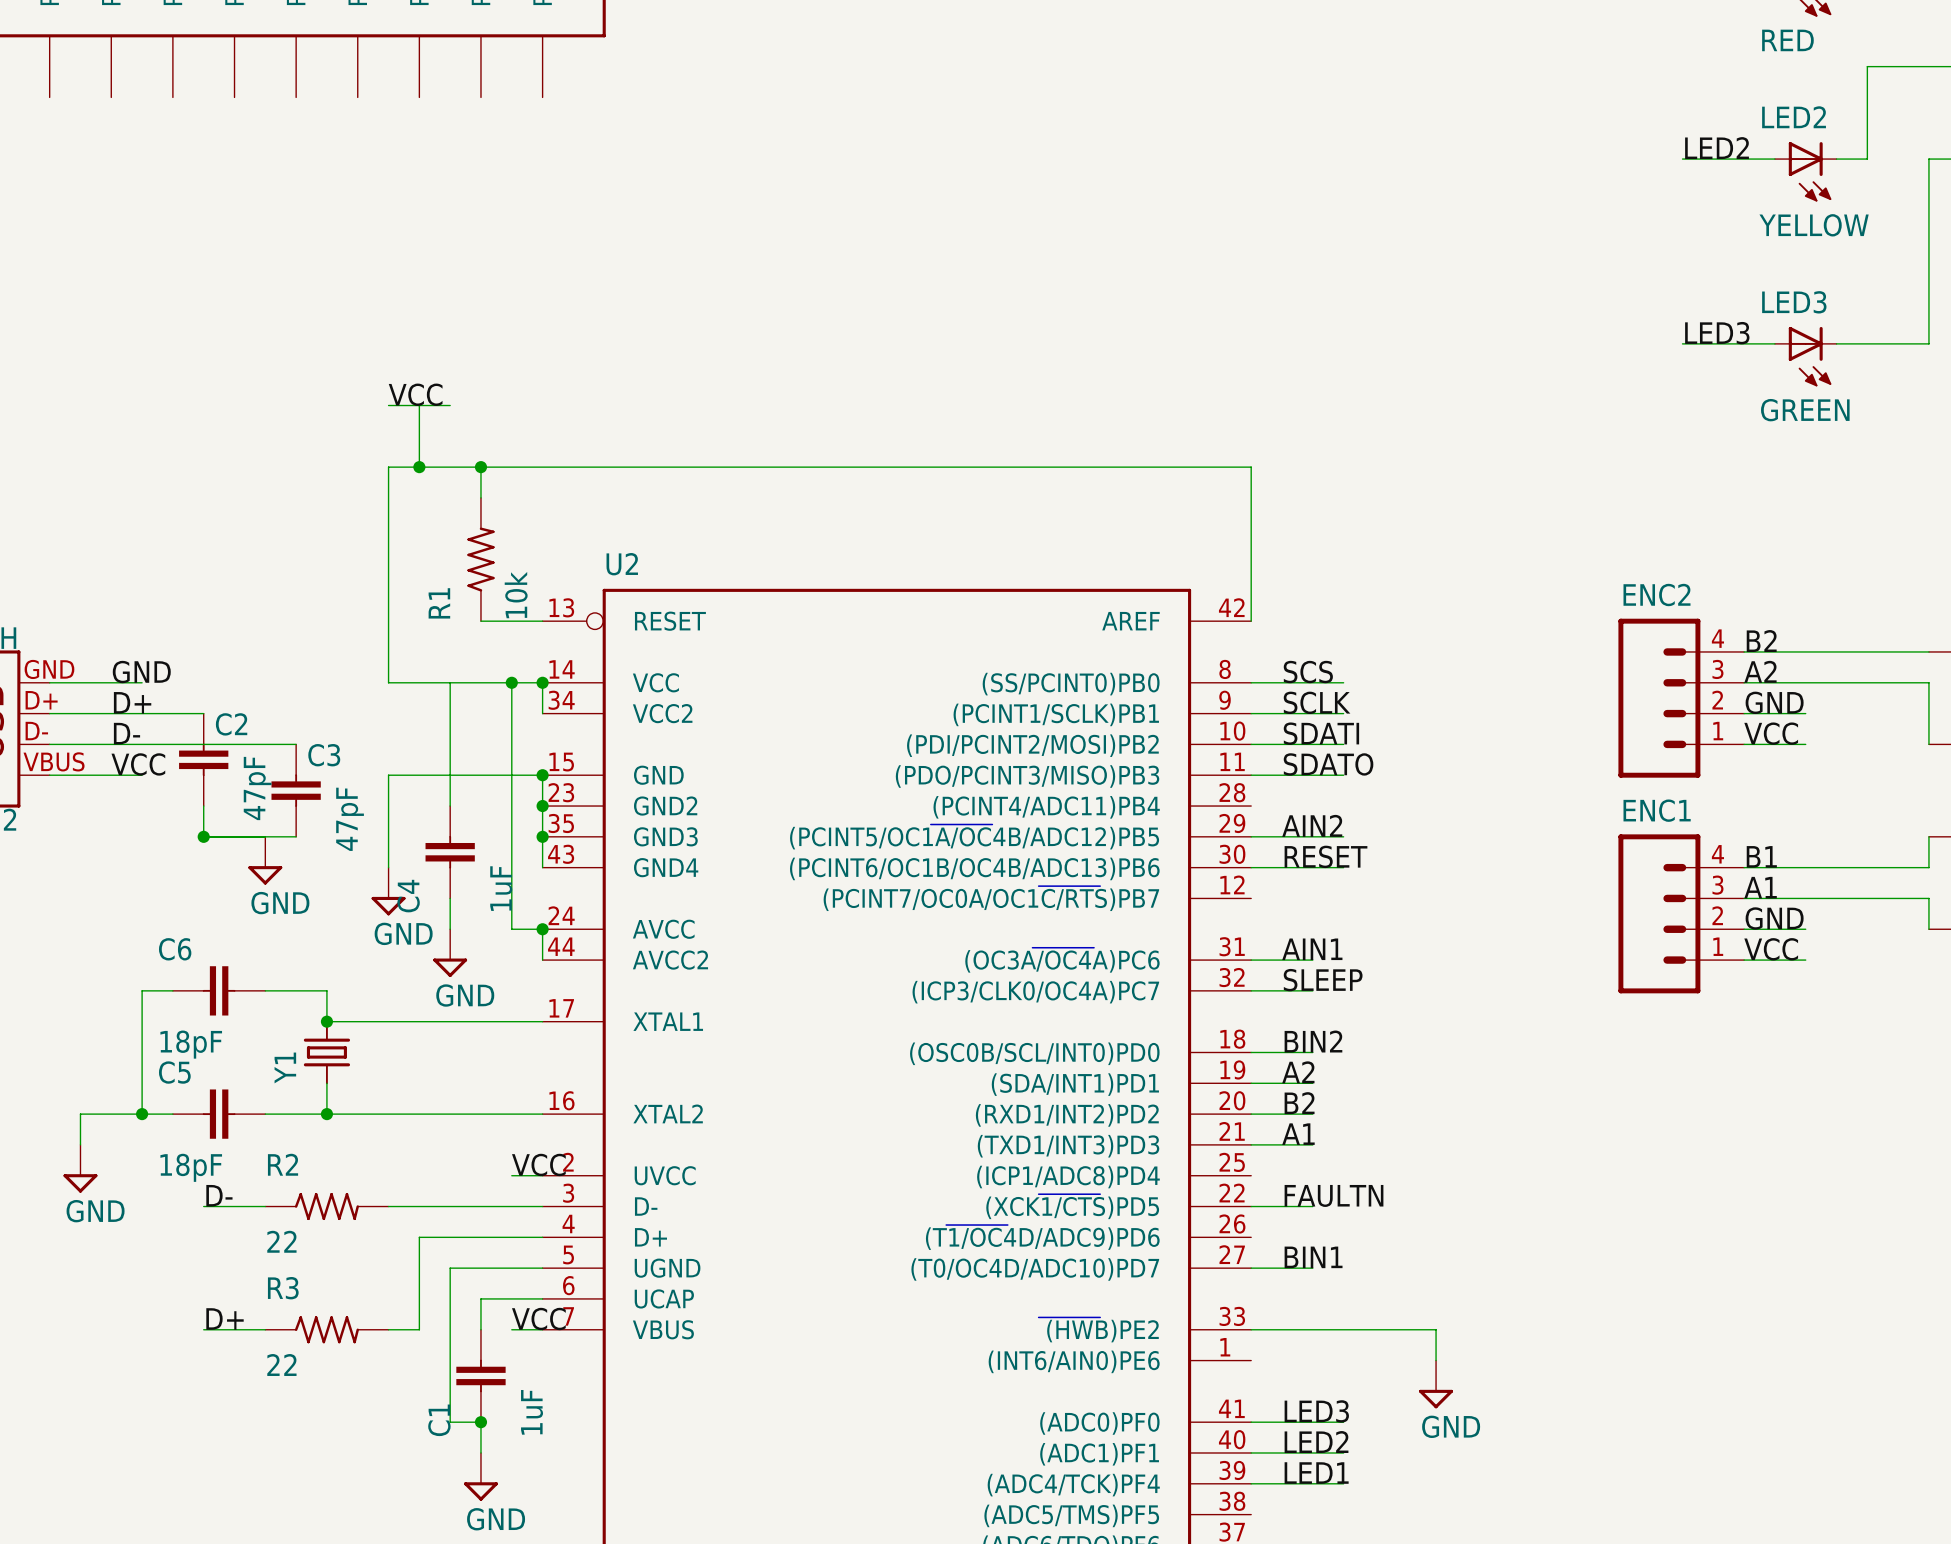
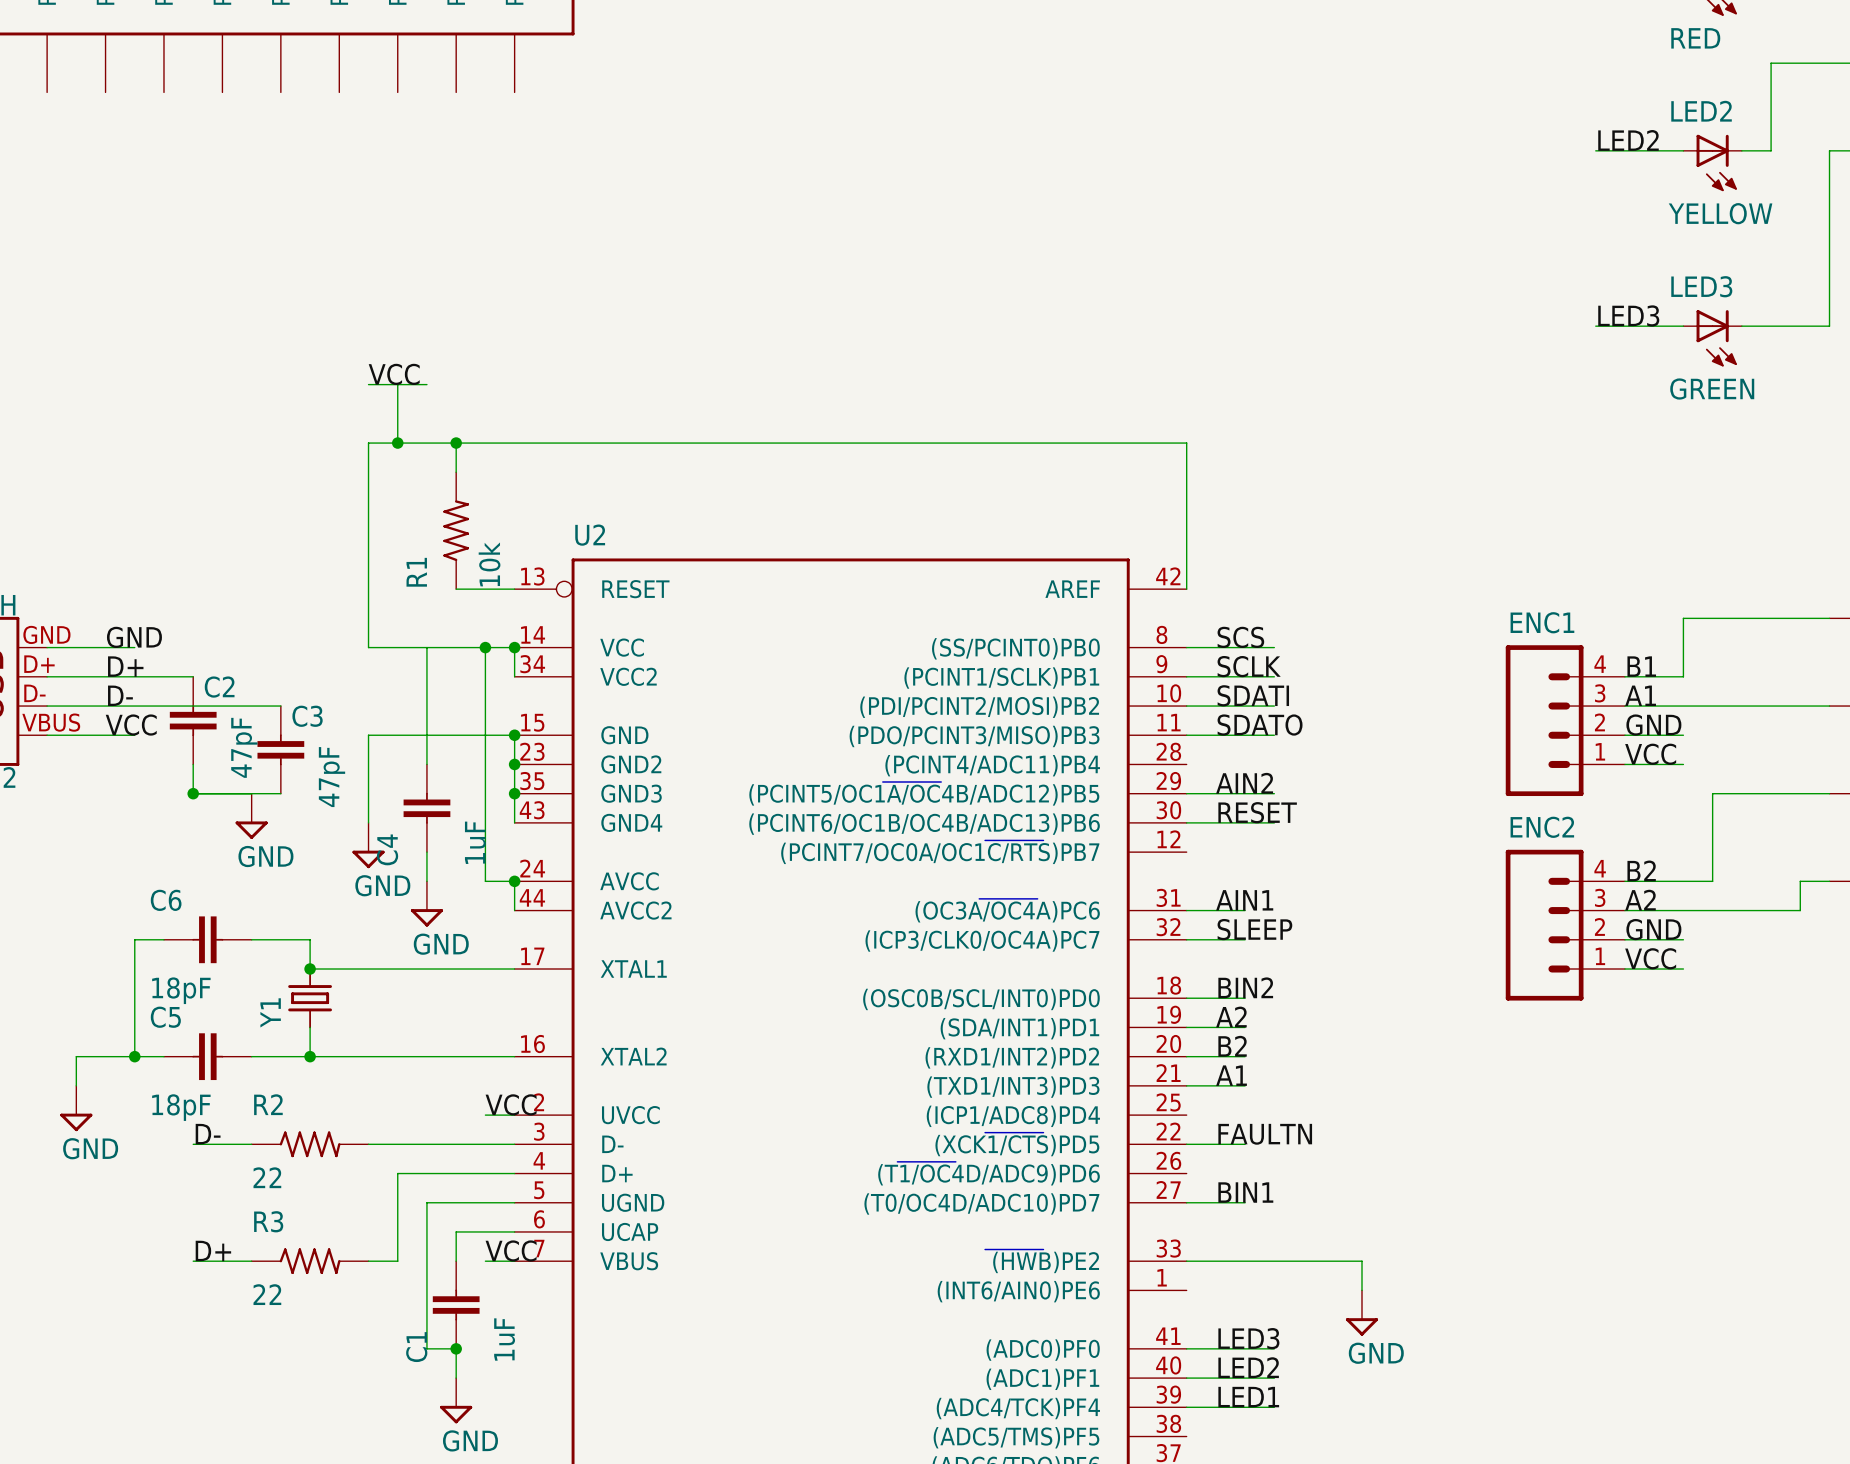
label position: B2 (1761, 641) -> B2 (1641, 870)
label position: A2 (1760, 671) -> A2 (1640, 900)
wire: (1744, 682) (1928, 682) (1928, 744) -> (1712, 706) (1829, 706)
ENC2 position: (1681, 698) -> (1565, 925)
label position: GND (1774, 702) -> GND (1653, 725)
wire: (1774, 713) (1805, 713) -> (1683, 676) (1683, 618)
label position: VCC (1771, 733) -> VCC (1650, 754)
wire: none -> (1624, 735) (1683, 735)
wire: none -> (1624, 764) (1683, 764)
wire: (1928, 836) (1928, 867) (1744, 867) -> (1829, 793) (1712, 793) (1712, 881)
label position: B1 (1761, 856) -> B1 (1641, 666)
label position: A1 (1760, 887) -> A1 (1640, 695)
wire: (1744, 898) (1928, 898) (1928, 929) -> (1712, 910) (1800, 910) (1800, 881) (1829, 881)
ENC1 position: (1681, 913) -> (1565, 720)
label position: GND (1774, 918) -> GND (1653, 929)
label position: VCC (1771, 949) -> VCC (1650, 958)
wire: none -> (1624, 939) (1683, 939)
wire: none -> (1624, 969) (1683, 969)

